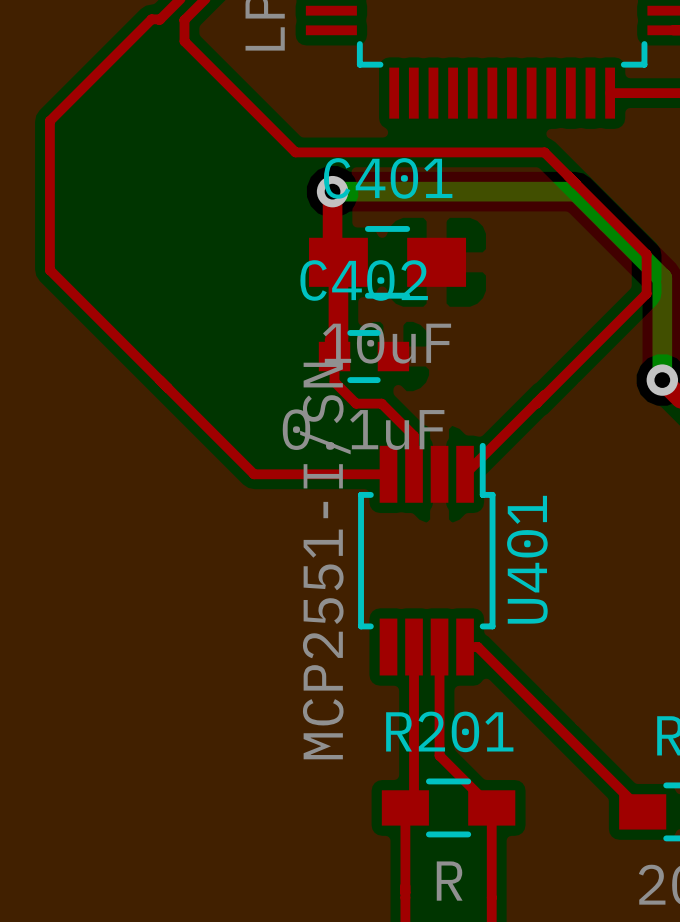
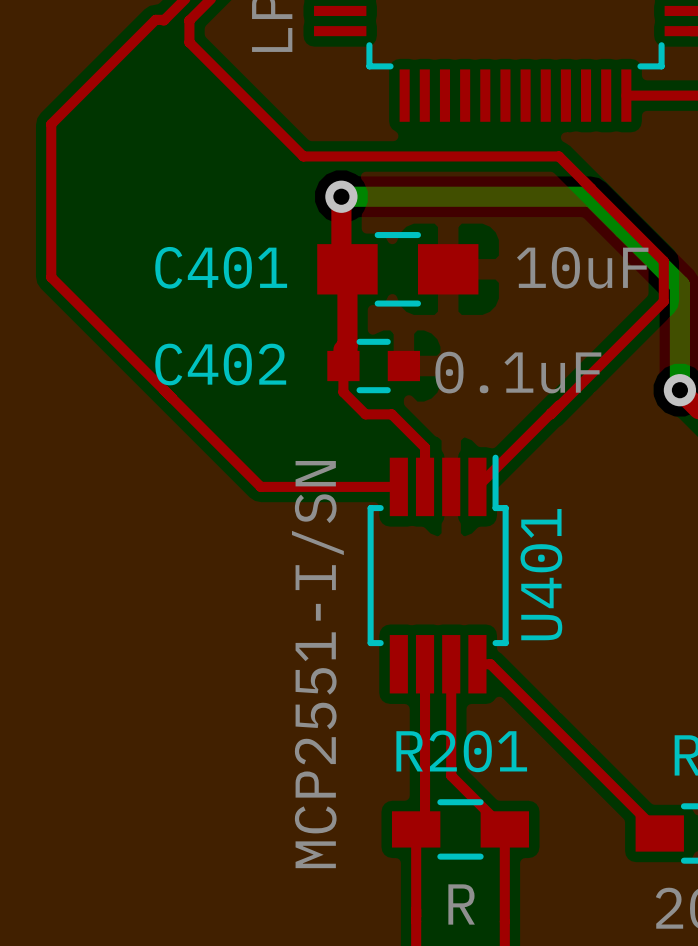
C401 name position: C401 (388, 178) -> C401 (221, 267)
C402 name position: C402 (364, 280) -> C402 (220, 364)
C401 value position: 10uF (387, 343) -> 10uF (582, 267)
C402 value position: 0.1uF (363, 429) -> 0.1uF (518, 372)
U401 value position: MCP2551-I/SN (325, 561) -> MCP2551-I/SN (317, 664)

